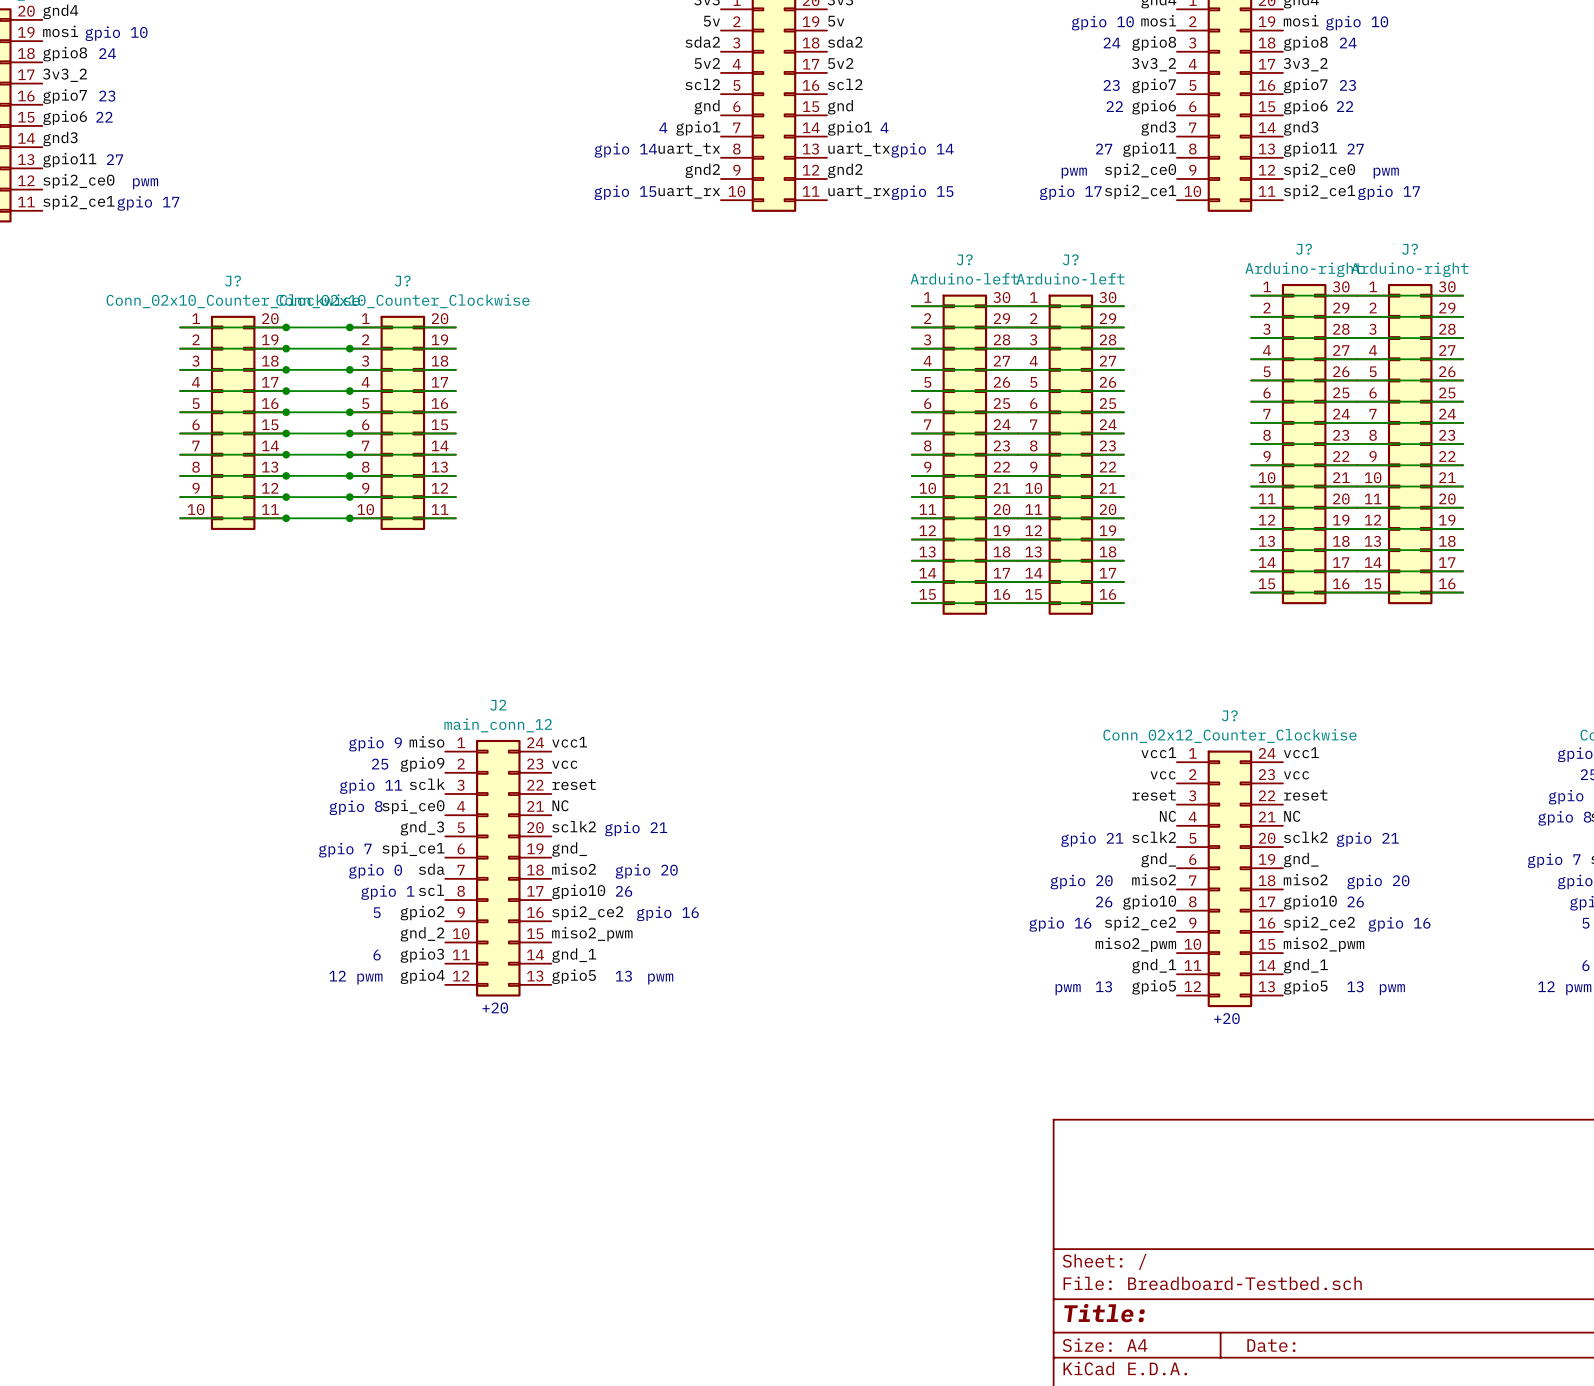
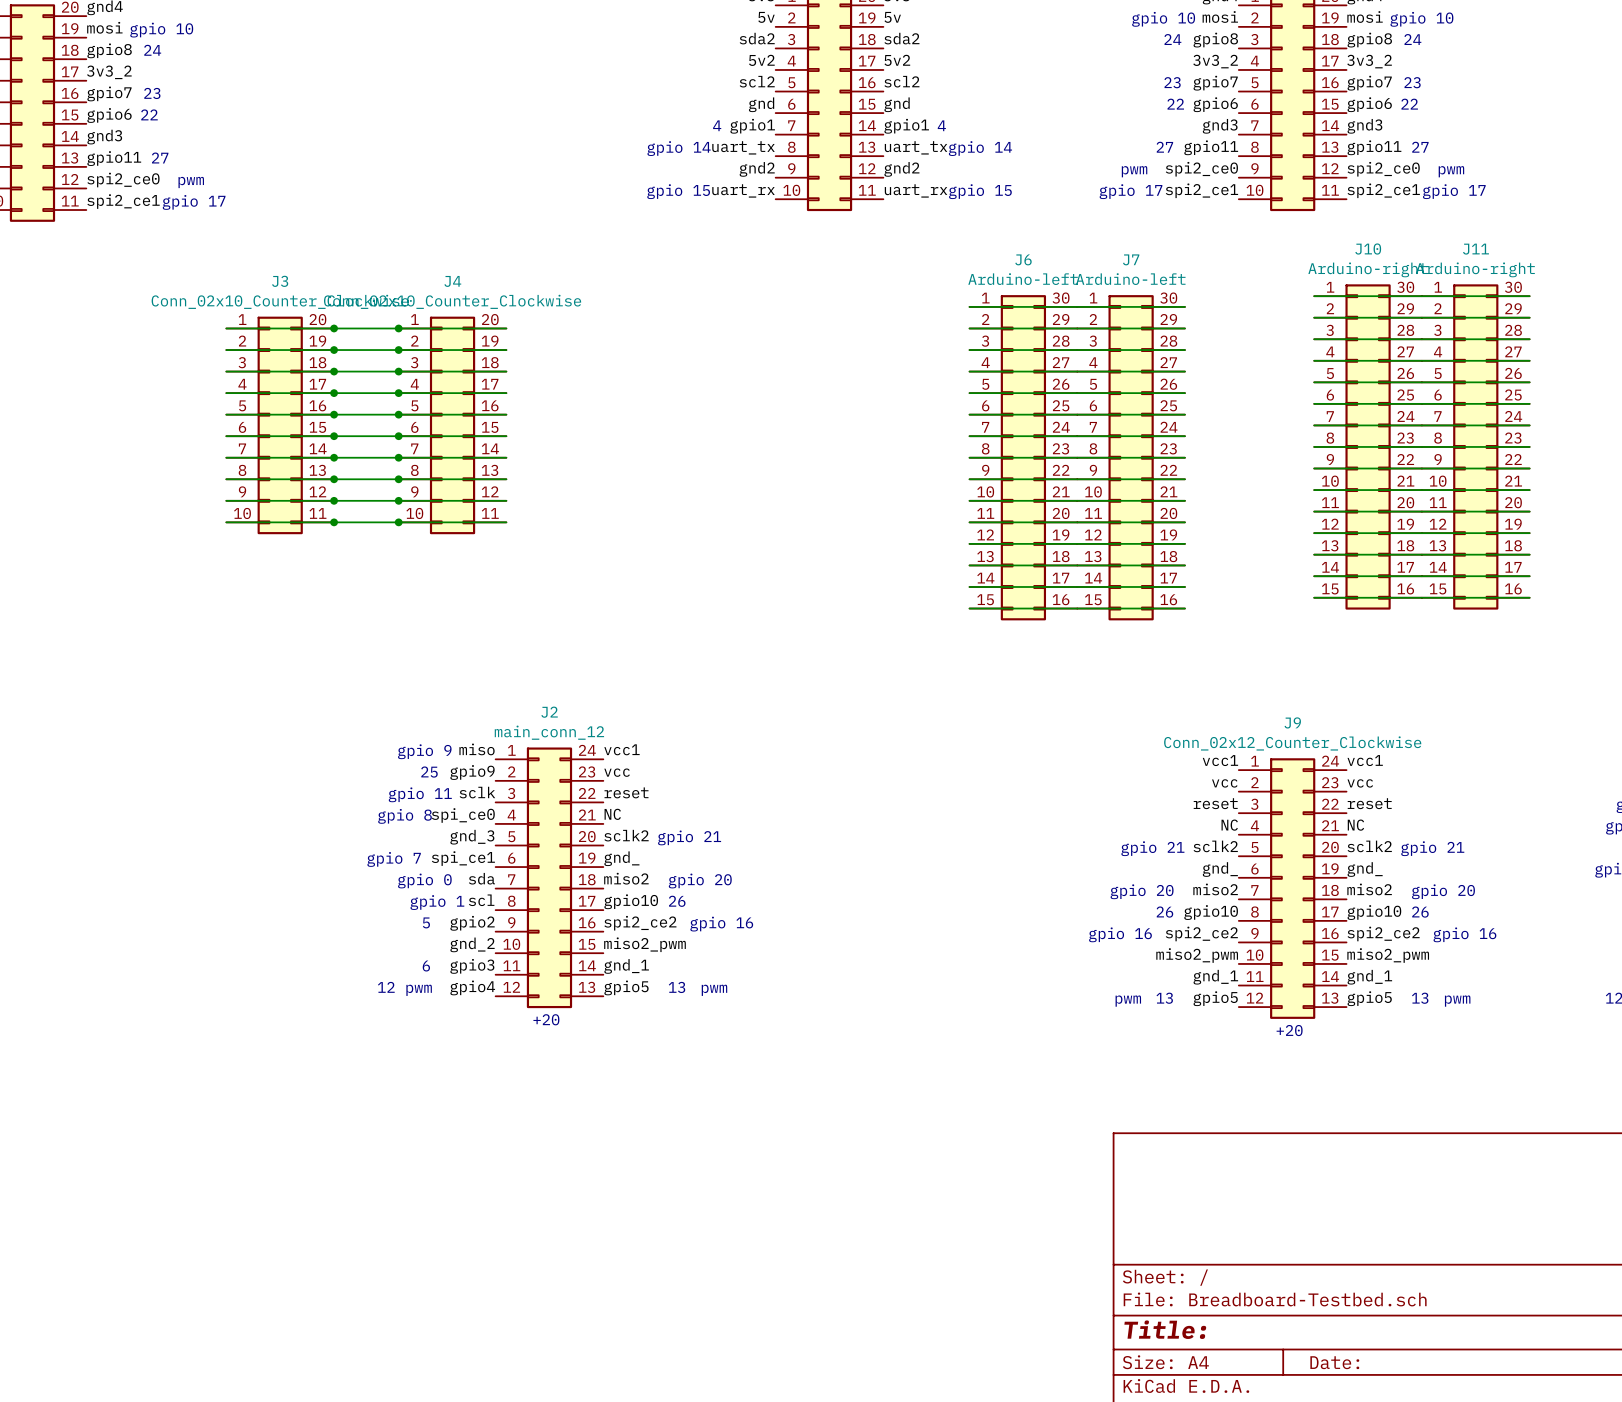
J? name: J? (1304, 249) -> J10 (1368, 249)
J? name: J? (1410, 249) -> J11 (1475, 249)
J? name: J? (964, 259) -> J6 (1023, 259)
J? name: J? (1070, 259) -> J7 (1131, 259)
J? name: J? (233, 281) -> J3 (280, 281)
J? name: J? (402, 281) -> J4 (452, 281)
J? name: J? (1229, 715) -> J9 (1292, 722)

